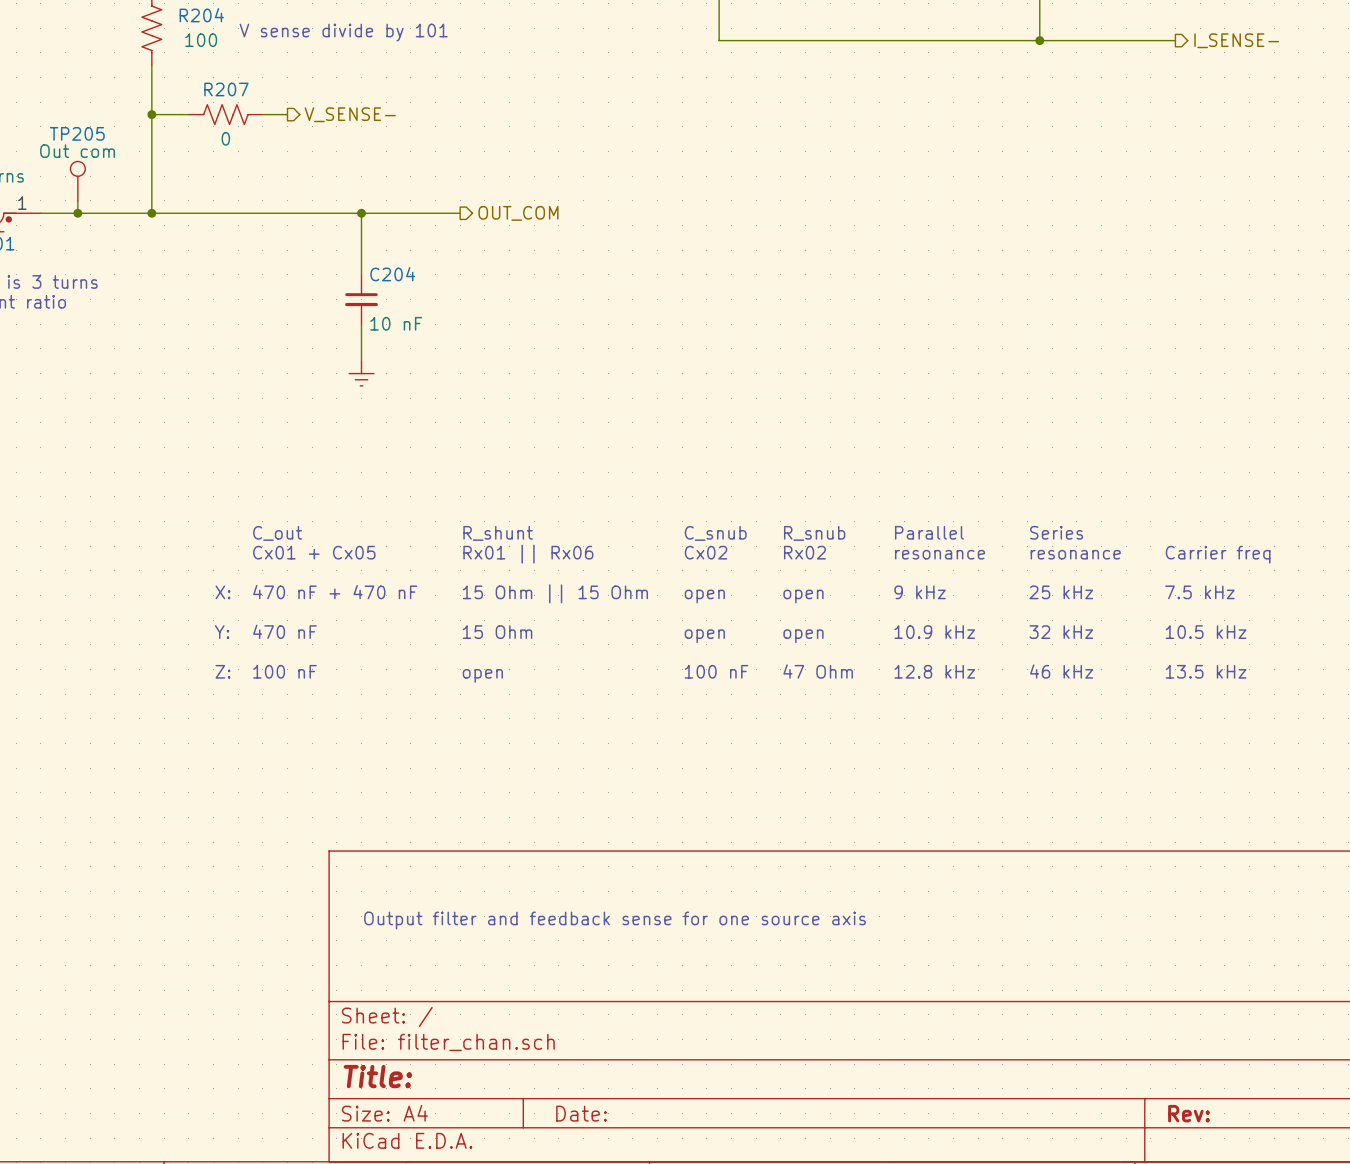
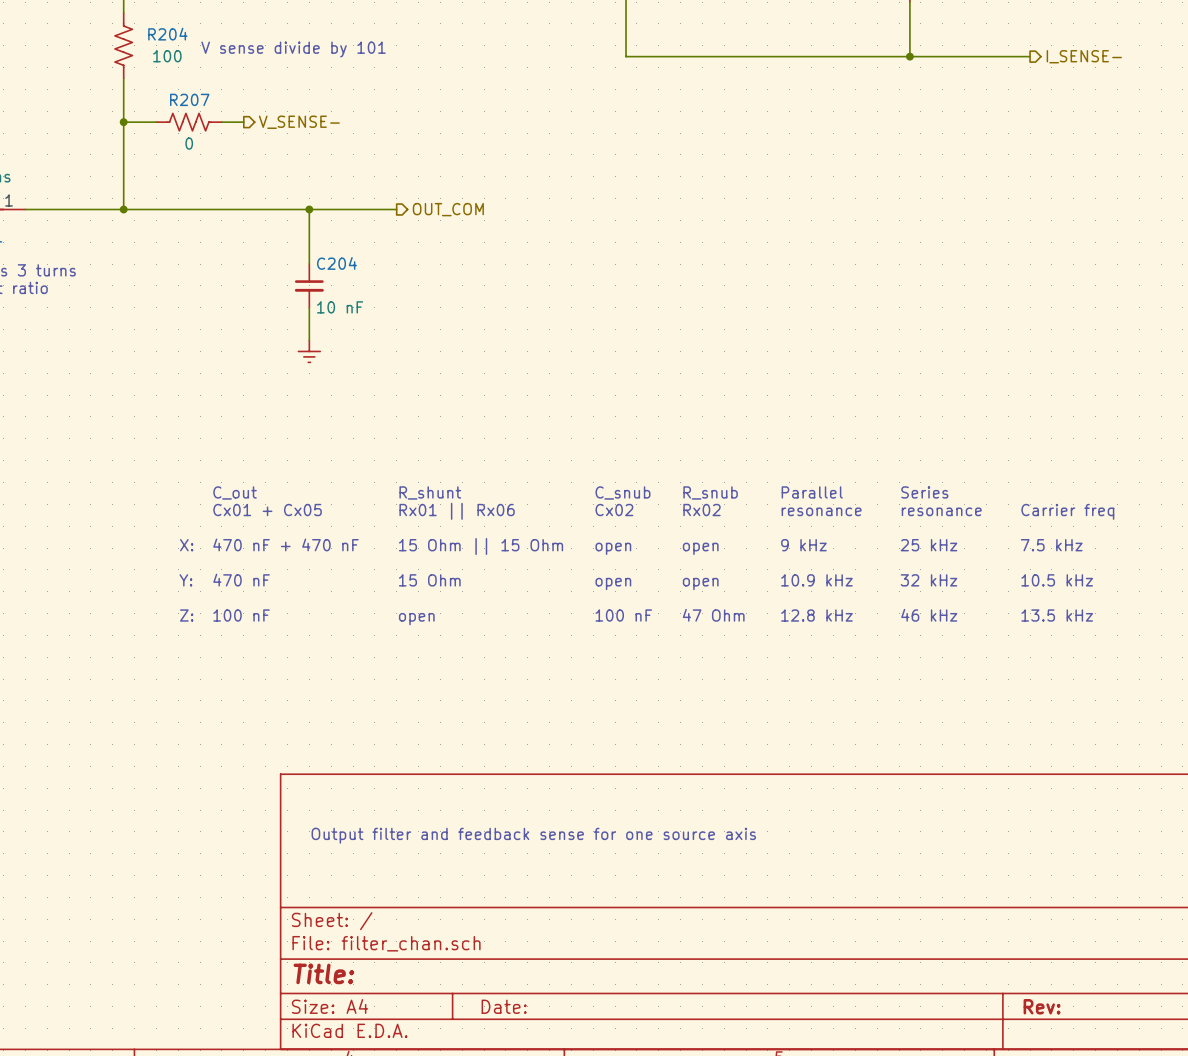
TP205: Out com (77, 181) -> none
wire: (77, 200) (77, 213) -> none
junction: (77, 213) -> none

